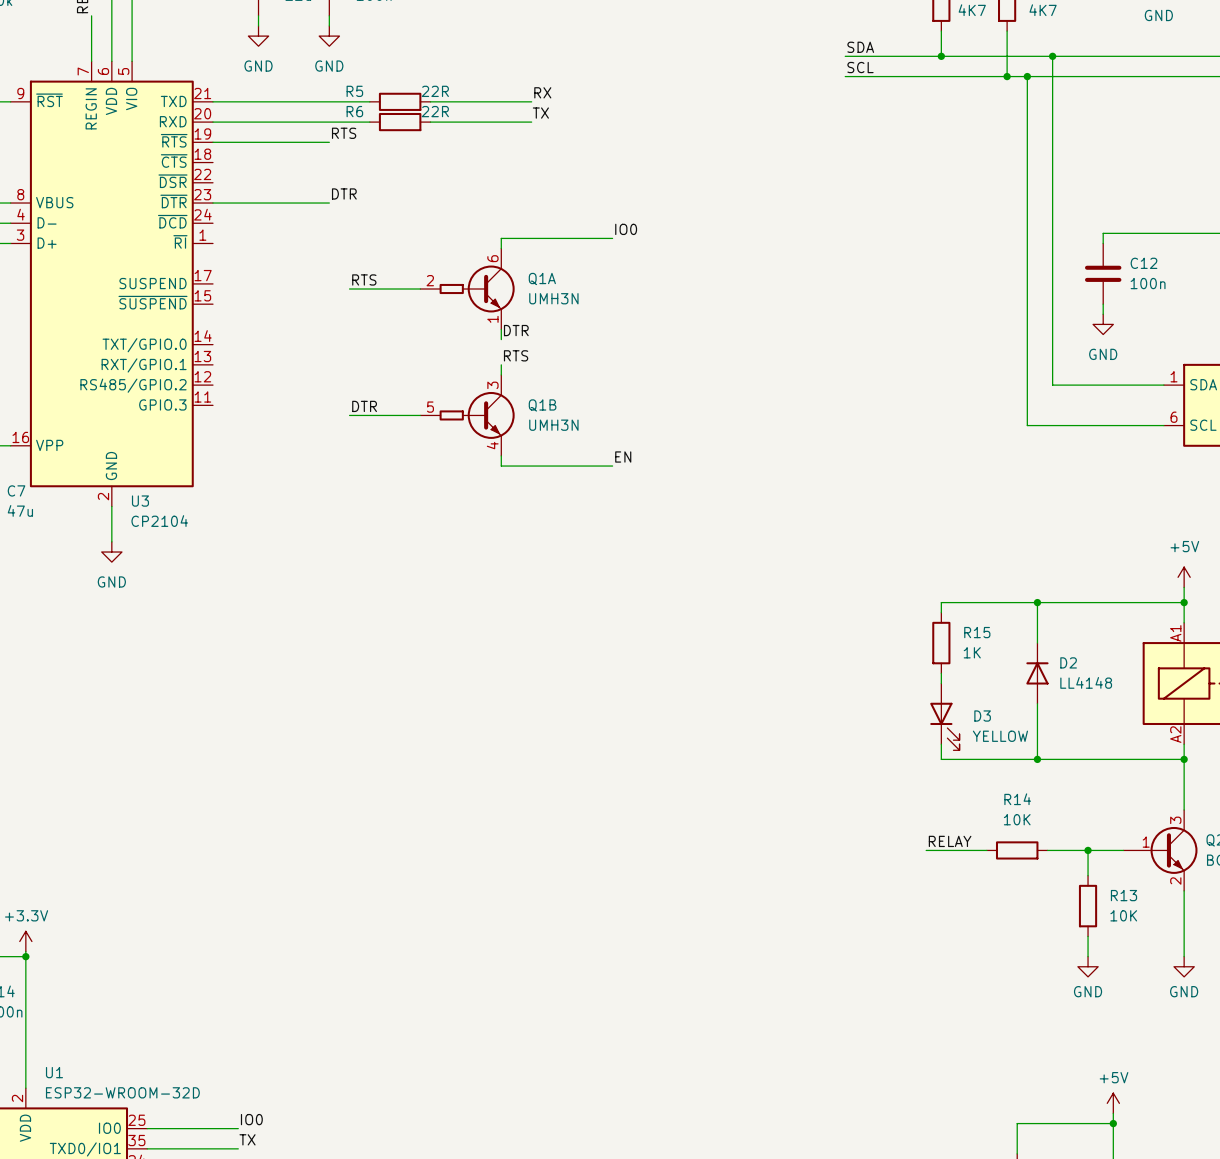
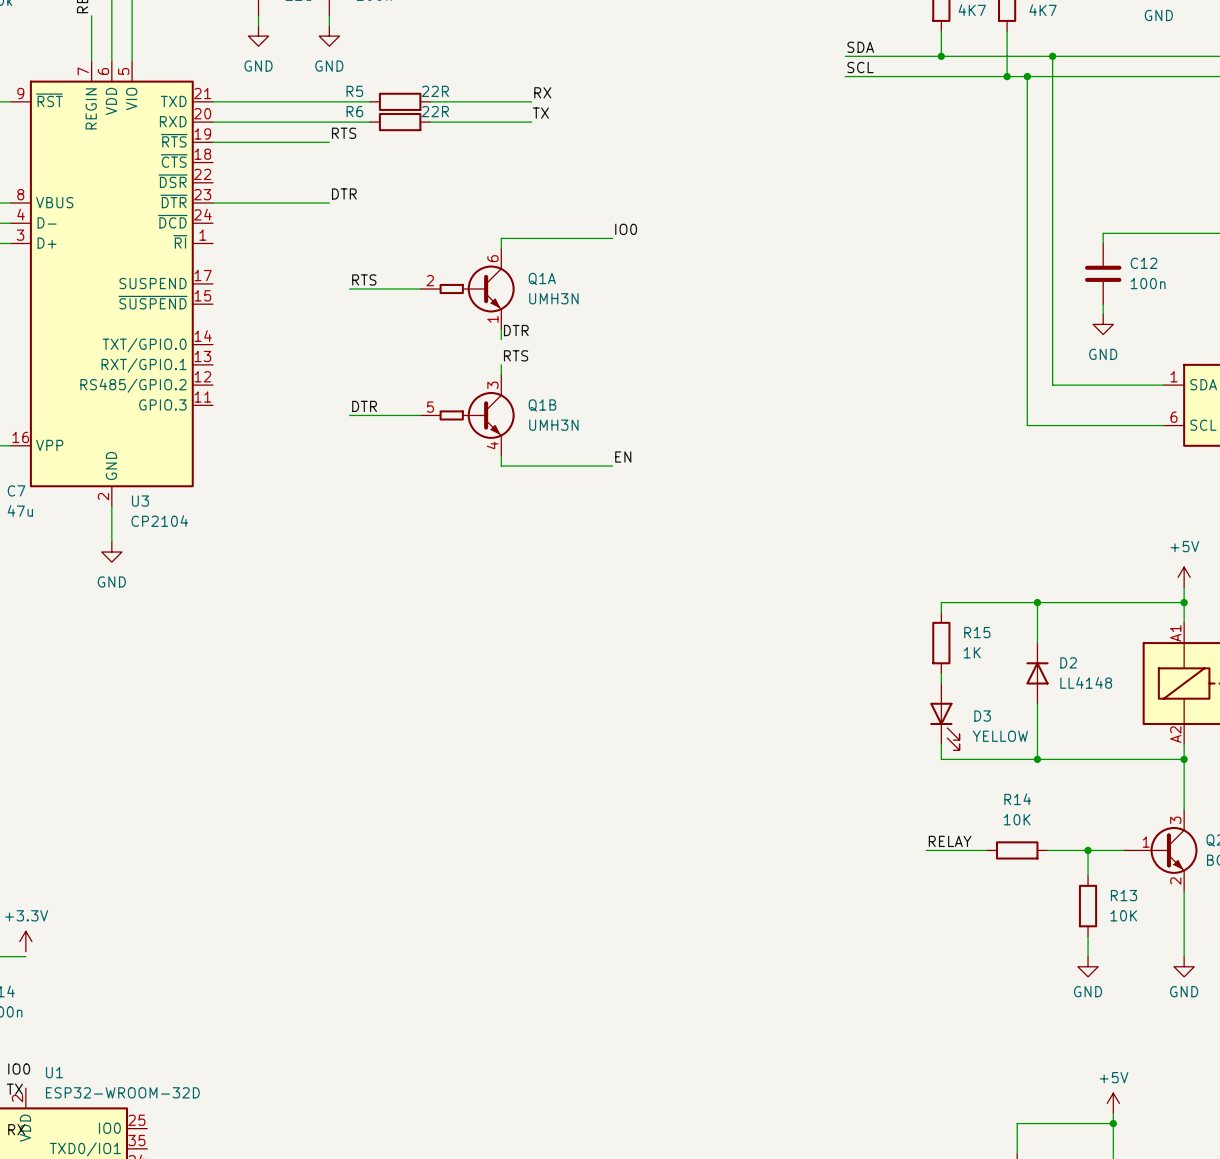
wire: (25, 951) (25, 1088) -> none
junction: (25, 956) -> none
label: none -> IO0 (19, 1069)
label: none -> TX (14, 1089)
label: IO0 (251, 1119) -> none
wire: (147, 1128) (238, 1128) -> none
label: none -> RX (16, 1129)
label: TX (247, 1139) -> none
wire: (147, 1148) (238, 1148) -> none

